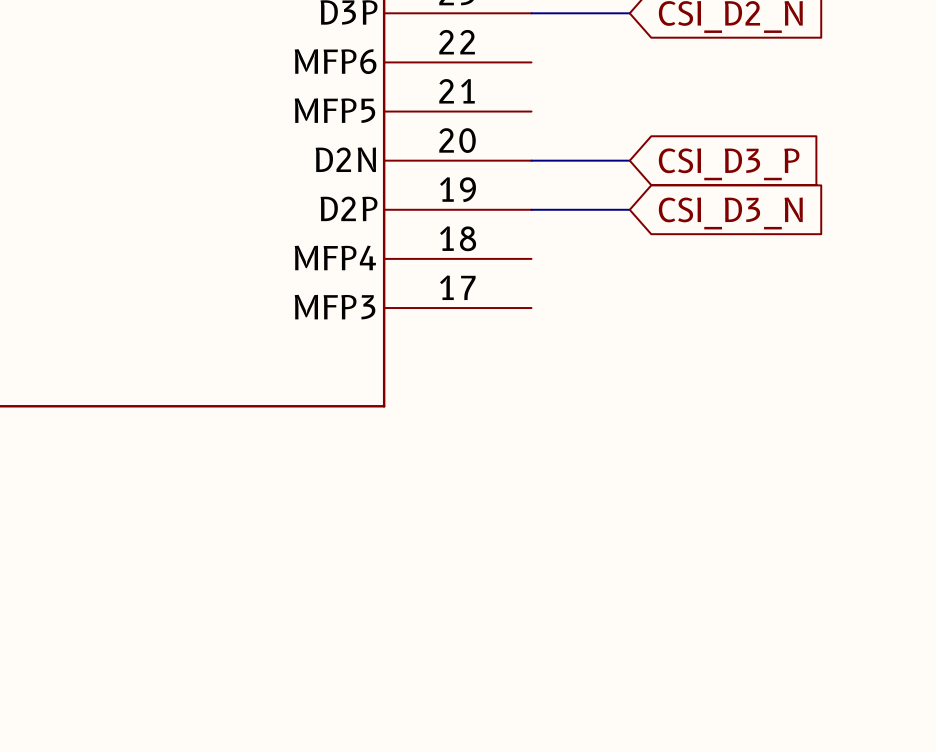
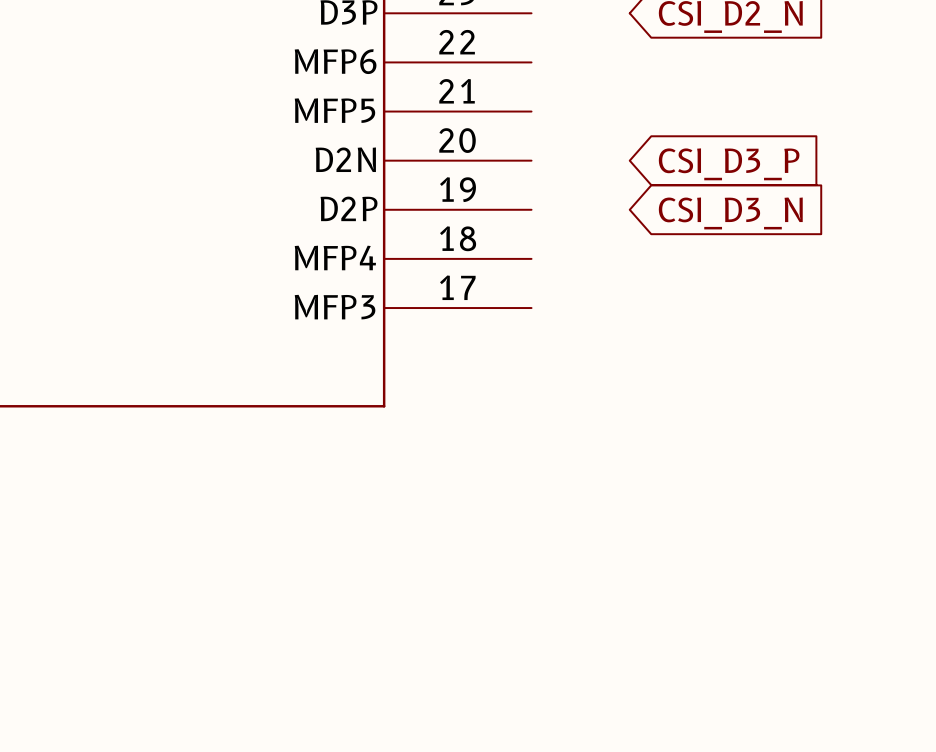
wire: (531, 13) (629, 13) -> none
wire: (531, 160) (629, 160) -> none
wire: (531, 209) (629, 209) -> none

